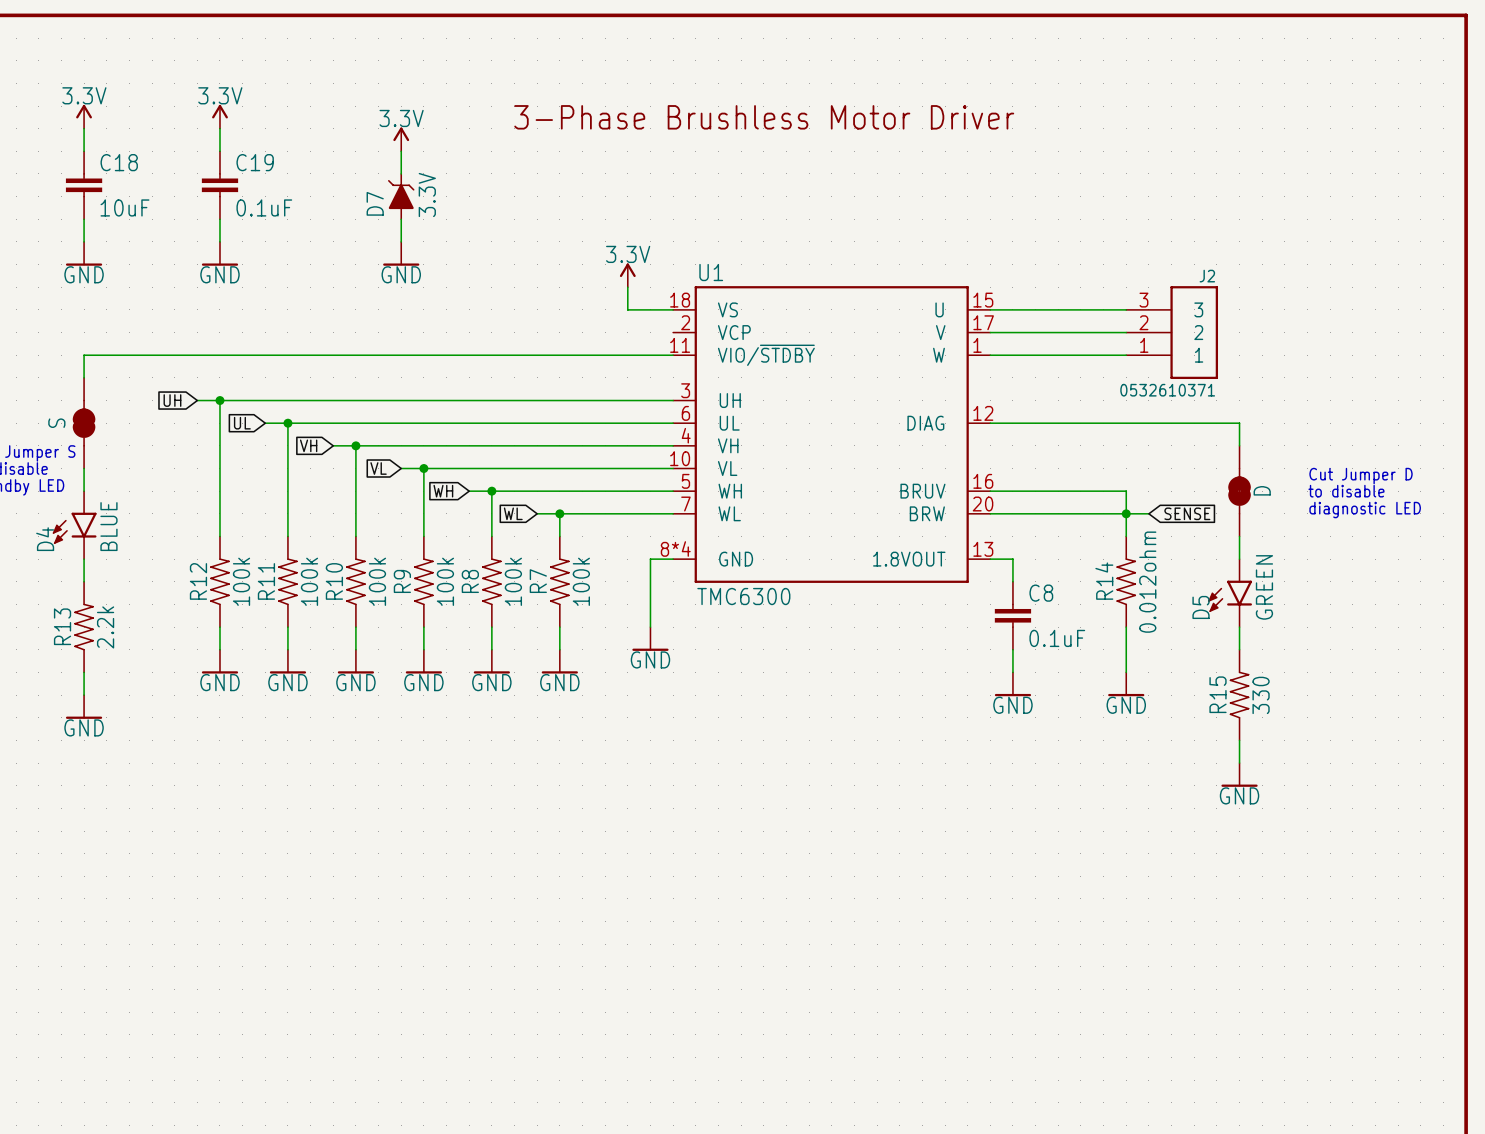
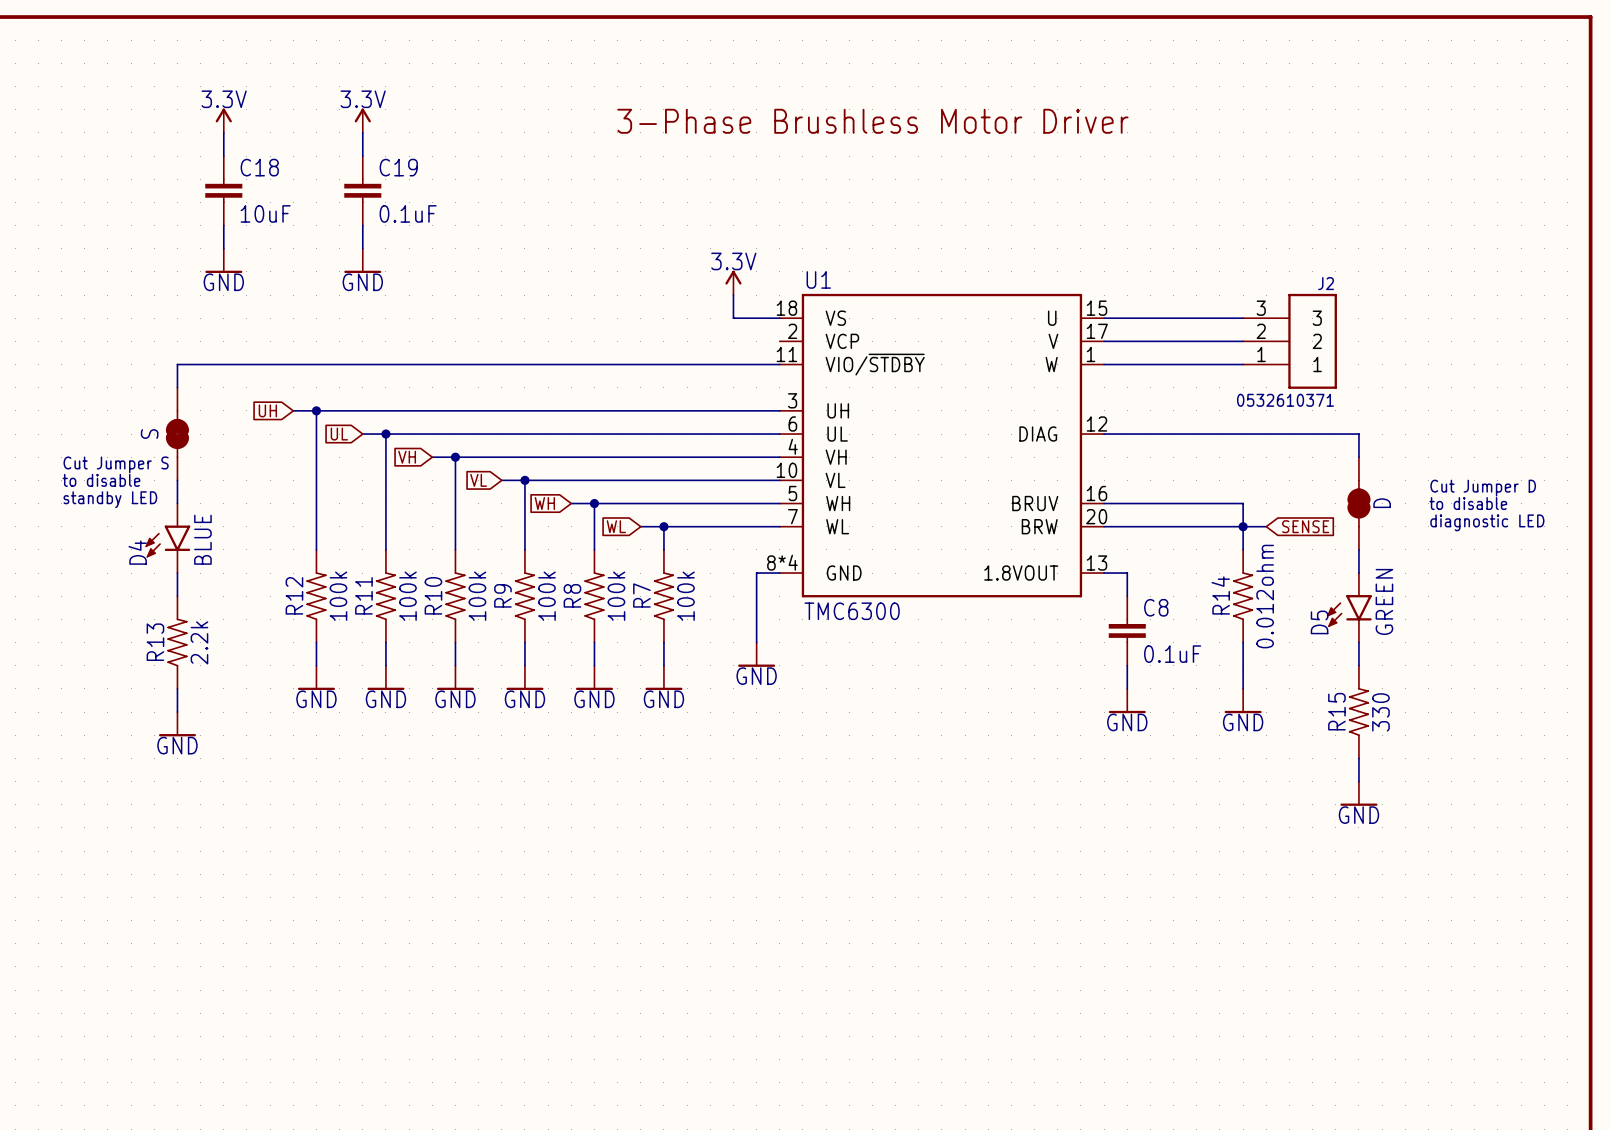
power symbol: 3.3V (84, 116) -> none
power symbol: none -> 3.3V (223, 120)
power symbol: 3.3V (219, 116) -> none
power symbol: none -> 3.3V (362, 120)
wire: (84, 128) (84, 151) -> (223, 132) (223, 156)
wire: (219, 128) (219, 151) -> (362, 132) (362, 156)
power symbol: 3.3V (401, 139) -> none
wire: (401, 151) (401, 173) -> none
C18 position: (84, 185) -> (223, 190)
C19 position: (219, 185) -> (362, 190)
D7: 3.3V (401, 196) -> none
wire: (84, 219) (84, 241) -> (223, 225) (223, 248)
wire: (219, 219) (219, 241) -> (362, 225) (362, 248)
wire: (401, 219) (401, 241) -> none
power symbol: GND (84, 253) -> none
power symbol: none -> GND (223, 260)
power symbol: GND (219, 253) -> none
power symbol: none -> GND (362, 260)
power symbol: GND (401, 253) -> none

